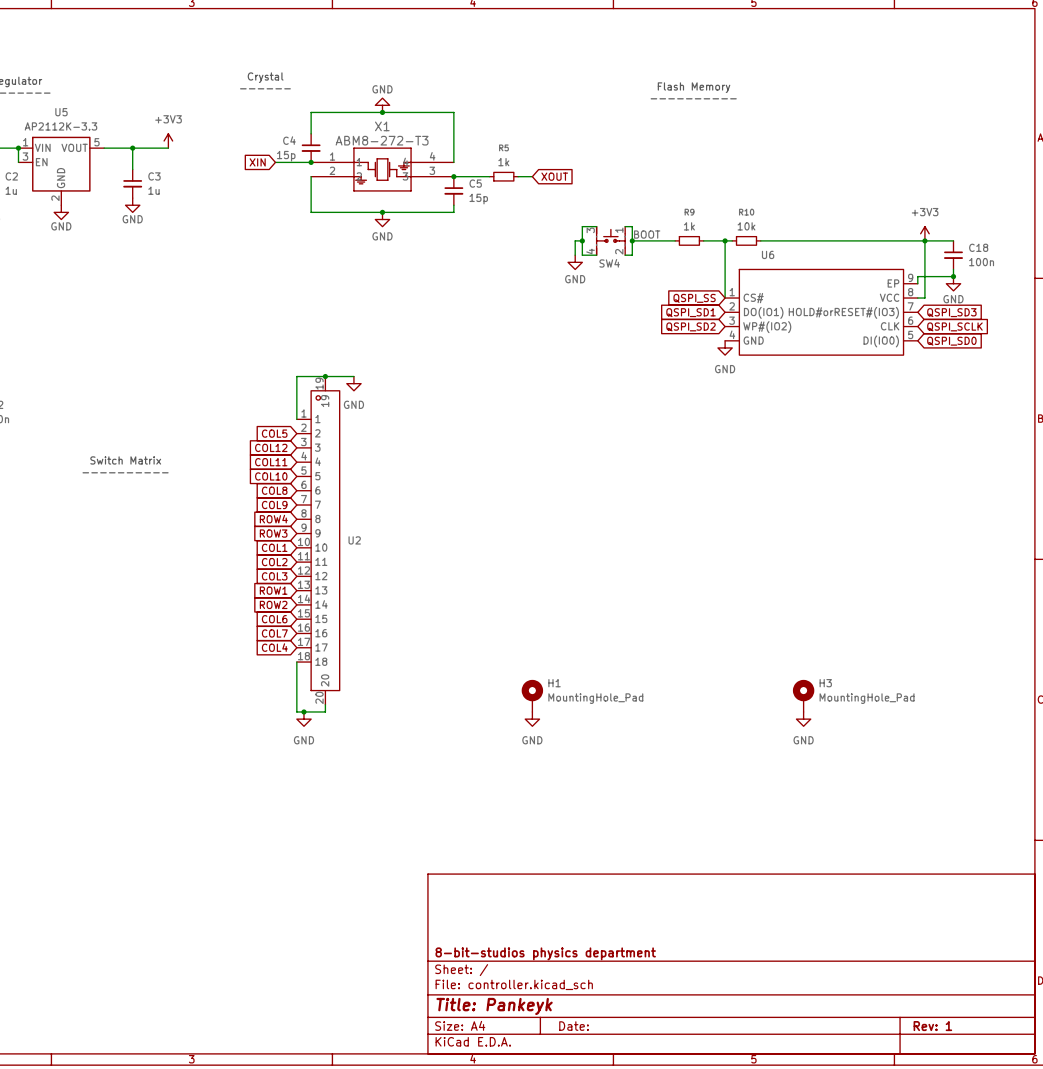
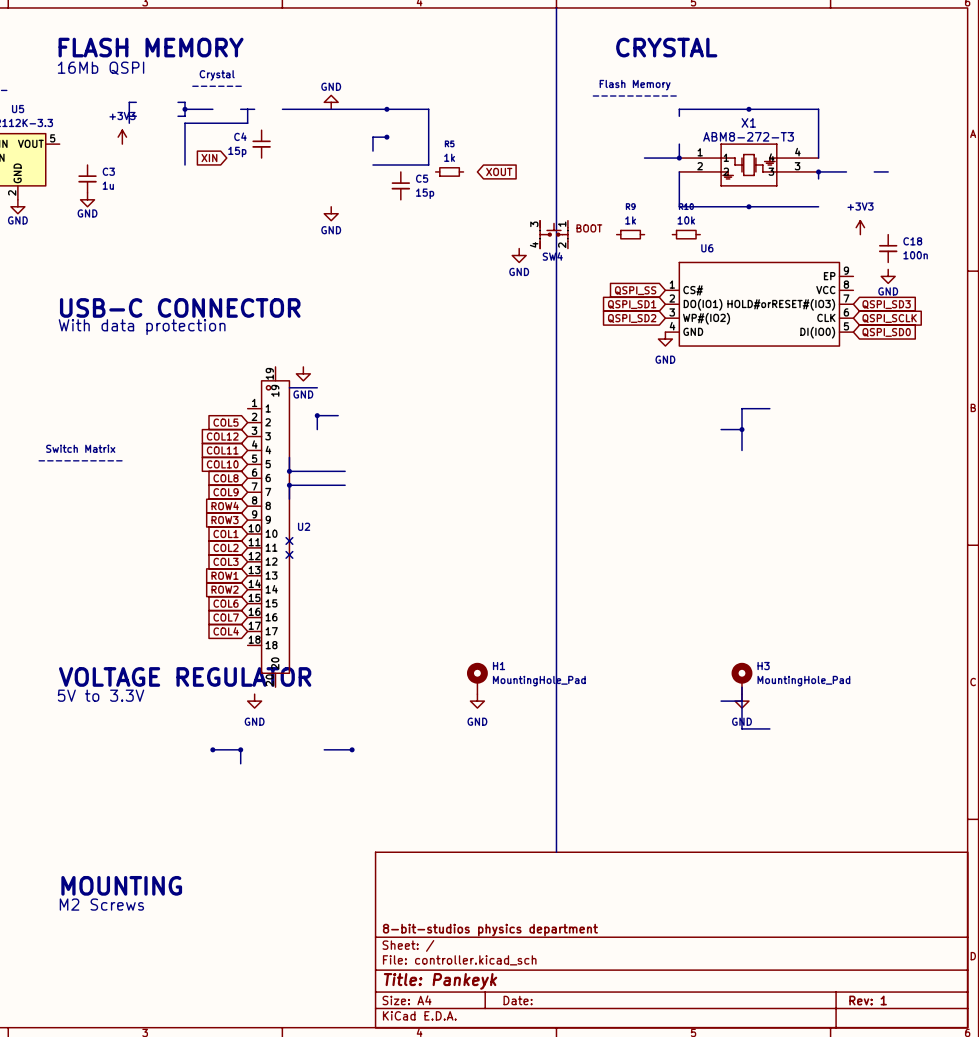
line: none -> (556, 7) (556, 852)
text: none -> FLASH MEMORY (151, 47)
text: none -> CRYSTAL (666, 47)
text: none -> 16Mb QSPI (101, 68)
wire: none -> (136, 102) (129, 102) (129, 123)
wire: none -> (178, 102) (185, 102) (185, 116) (178, 116)
wire: none -> (185, 109) (212, 109)
junction: none -> (185, 109)
wire: none -> (240, 109) (254, 109)
wire: none -> (247, 109) (247, 123) (185, 123) (185, 165)
wire: (332, 112) (311, 112) (311, 133) -> none
junction: (382, 112) -> none
junction: none -> (386, 109)
wire: (453, 112) (453, 162) -> (400, 109) (428, 109) (428, 165) (372, 165)
junction: none -> (748, 109)
wire: none -> (129, 116) (136, 116)
wire: none -> (679, 116) (679, 109) (818, 109) (818, 158)
wire: none -> (386, 137) (372, 137) (372, 151)
junction: none -> (386, 137)
wire: (104, 148) (168, 148) -> none
wire: (132, 148) (132, 169) -> none
junction: (132, 148) -> none
wire: none -> (679, 144) (679, 158) (644, 158)
wire: (275, 162) (311, 162) -> none
junction: (311, 162) -> none
junction: none -> (679, 158)
X1 position: (382, 169) -> (748, 165)
wire: (311, 176) (311, 212) (453, 212) (453, 205) -> none
wire: (453, 176) (489, 176) -> none
junction: (453, 176) -> none
wire: (518, 176) (532, 176) -> none
wire: none -> (679, 171) (679, 206) (818, 206)
junction: none -> (818, 171)
wire: none -> (846, 171) (818, 171) (818, 178)
wire: none -> (874, 171) (888, 171)
junction: (382, 212) -> none
junction: none -> (748, 206)
wire: (596, 226) (582, 226) (582, 255) (596, 255) -> none
wire: (625, 226) (632, 226) (632, 255) (625, 255) -> none
wire: (582, 240) (575, 240) (575, 255) -> none
junction: (582, 240) -> none
wire: (632, 240) (675, 240) -> none
junction: (632, 240) -> none
wire: (703, 240) (732, 240) -> none
wire: (725, 240) (725, 298) -> none
junction: (725, 240) -> none
wire: (760, 240) (953, 240) -> none
wire: (924, 240) (924, 298) (917, 298) -> none
junction: (924, 240) -> none
wire: (953, 269) (953, 276) (917, 276) (917, 283) -> none
junction: (953, 276) -> none
text: none -> USB-C CONNECTOR (180, 307)
text: none -> With data protection (142, 327)
junction: (325, 376) -> none
wire: (353, 376) (296, 376) (296, 419) -> none
wire: none -> (289, 387) (317, 387)
wire: none -> (769, 408) (741, 408) (741, 450)
junction: none -> (317, 415)
wire: none -> (338, 415) (317, 415) (317, 429)
wire: none -> (721, 429) (741, 429)
junction: none -> (741, 429)
wire: none -> (289, 457) (289, 471) (345, 471)
junction: none -> (289, 471)
junction: none -> (289, 485)
wire: none -> (345, 485) (289, 485) (289, 499)
no-connect mark: none -> (289, 540)
no-connect mark: none -> (289, 554)
wire: (296, 662) (296, 711) (325, 711) (325, 704) -> none
text: none -> VOLTAGE REGULATOR (185, 676)
wire: none -> (741, 687) (741, 728) (769, 728)
junction: (303, 711) -> none
text: none -> 5V to 3.3V (101, 695)
wire: none -> (721, 701) (741, 701)
wire: none -> (212, 749) (240, 749) (240, 763)
junction: none -> (212, 749)
junction: none -> (240, 749)
wire: none -> (324, 749) (352, 749)
junction: none -> (352, 749)
text: none -> MOUNTING (121, 885)
text: none -> M2 Screws (101, 904)

